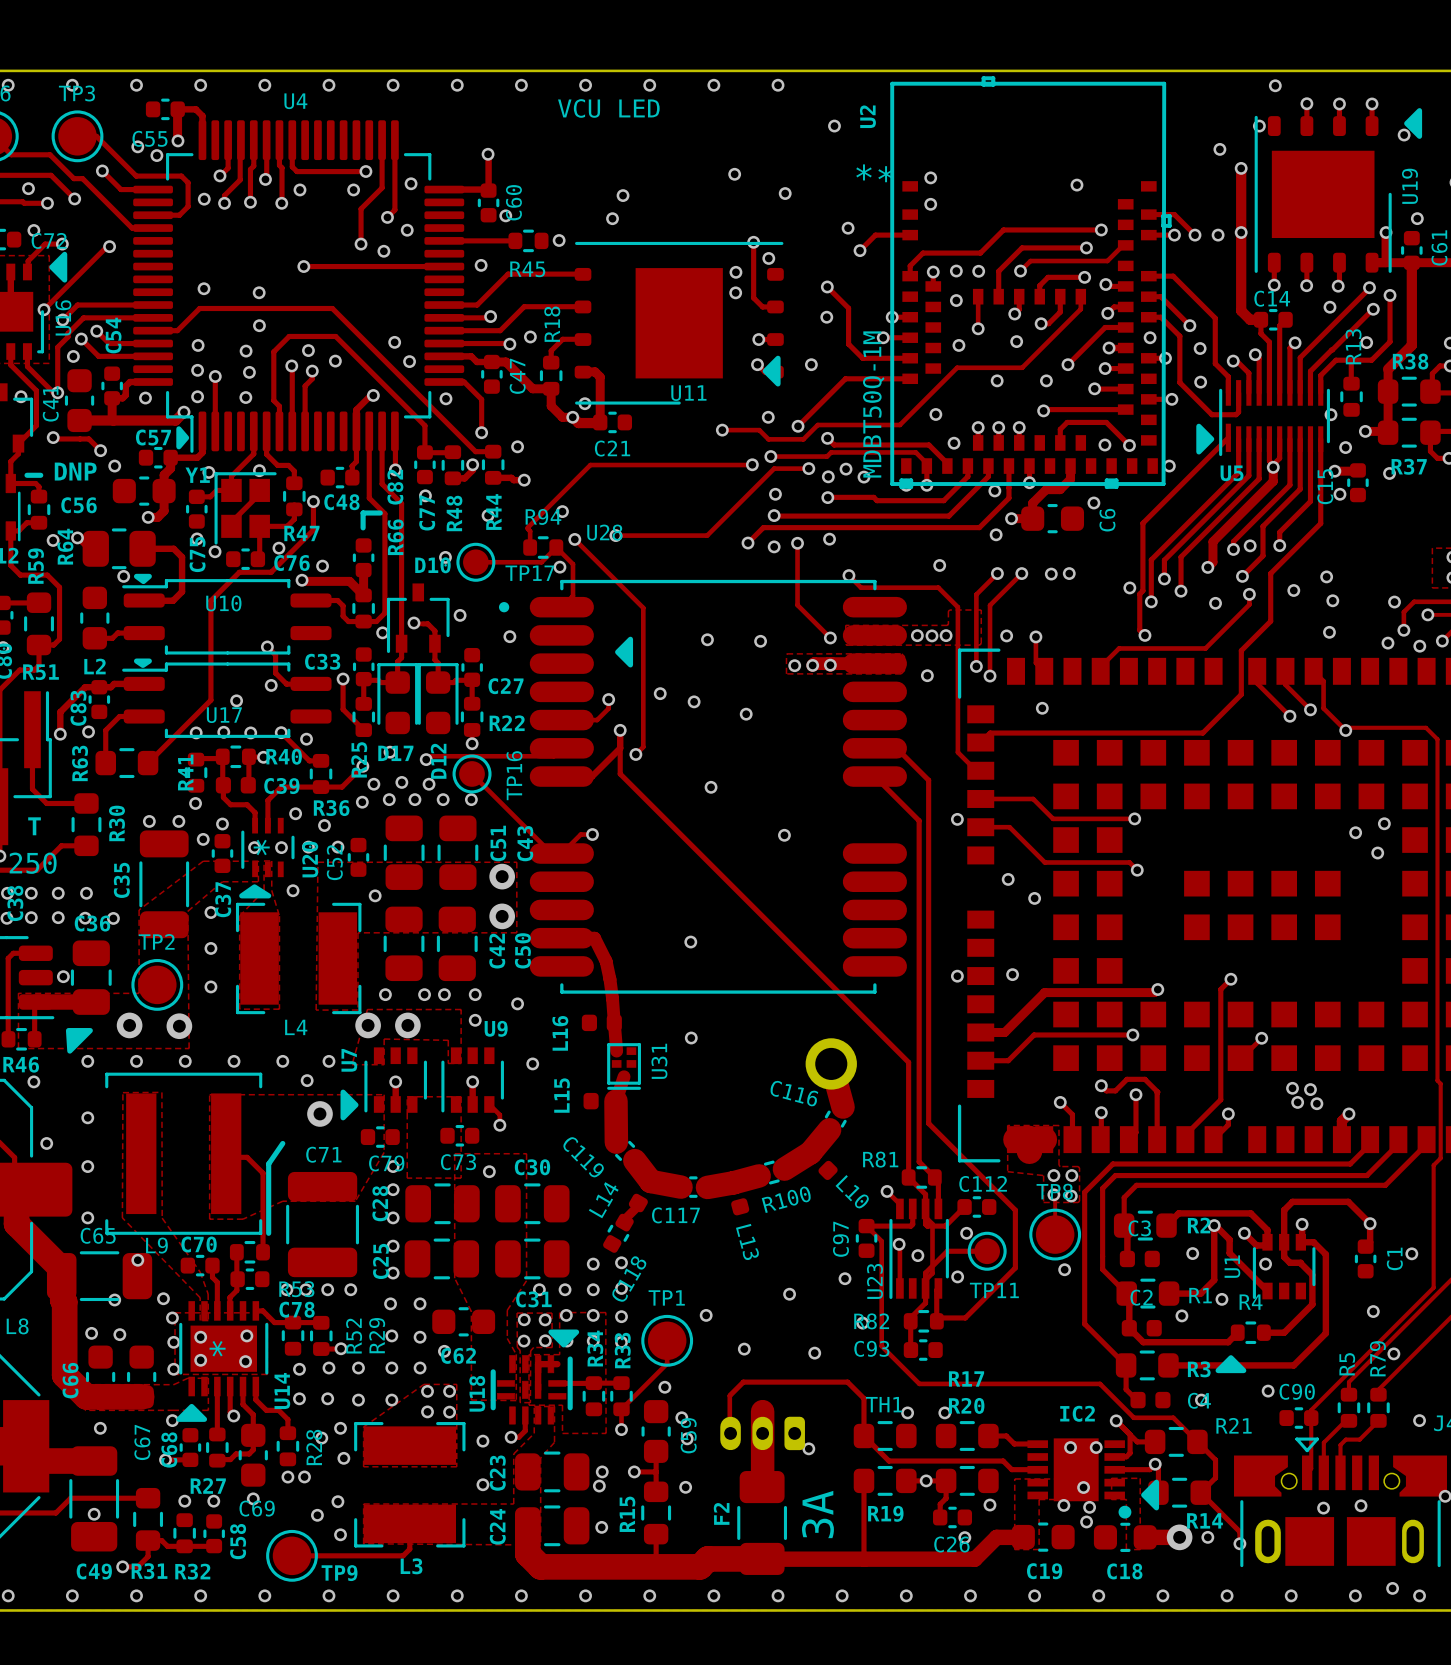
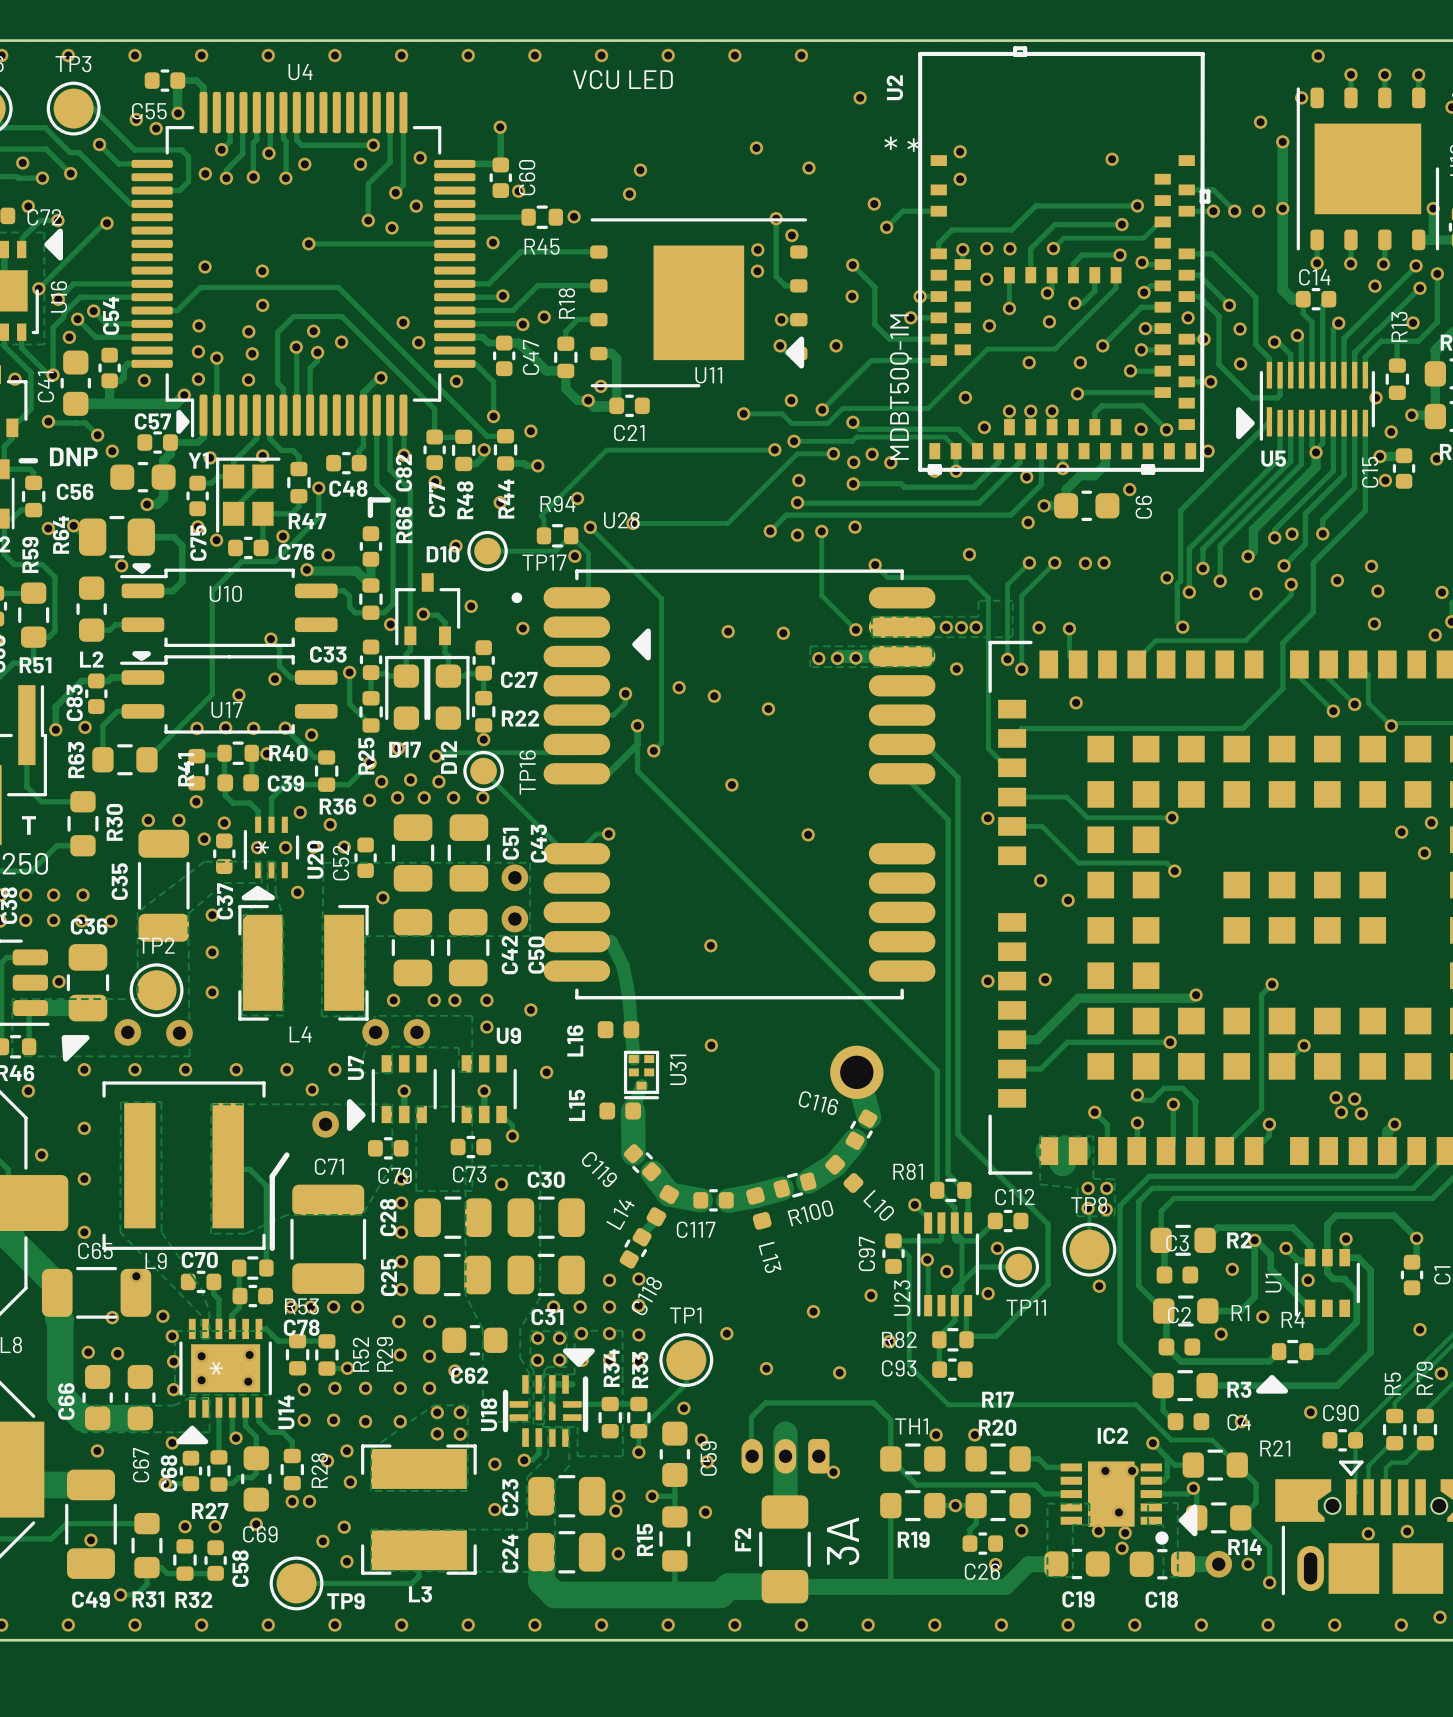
track: (1228, 1520) (1239, 1531) (1239, 1543) -> (1269, 1546) (1269, 1582)
via position: (1239, 1543) -> (1269, 1582)

